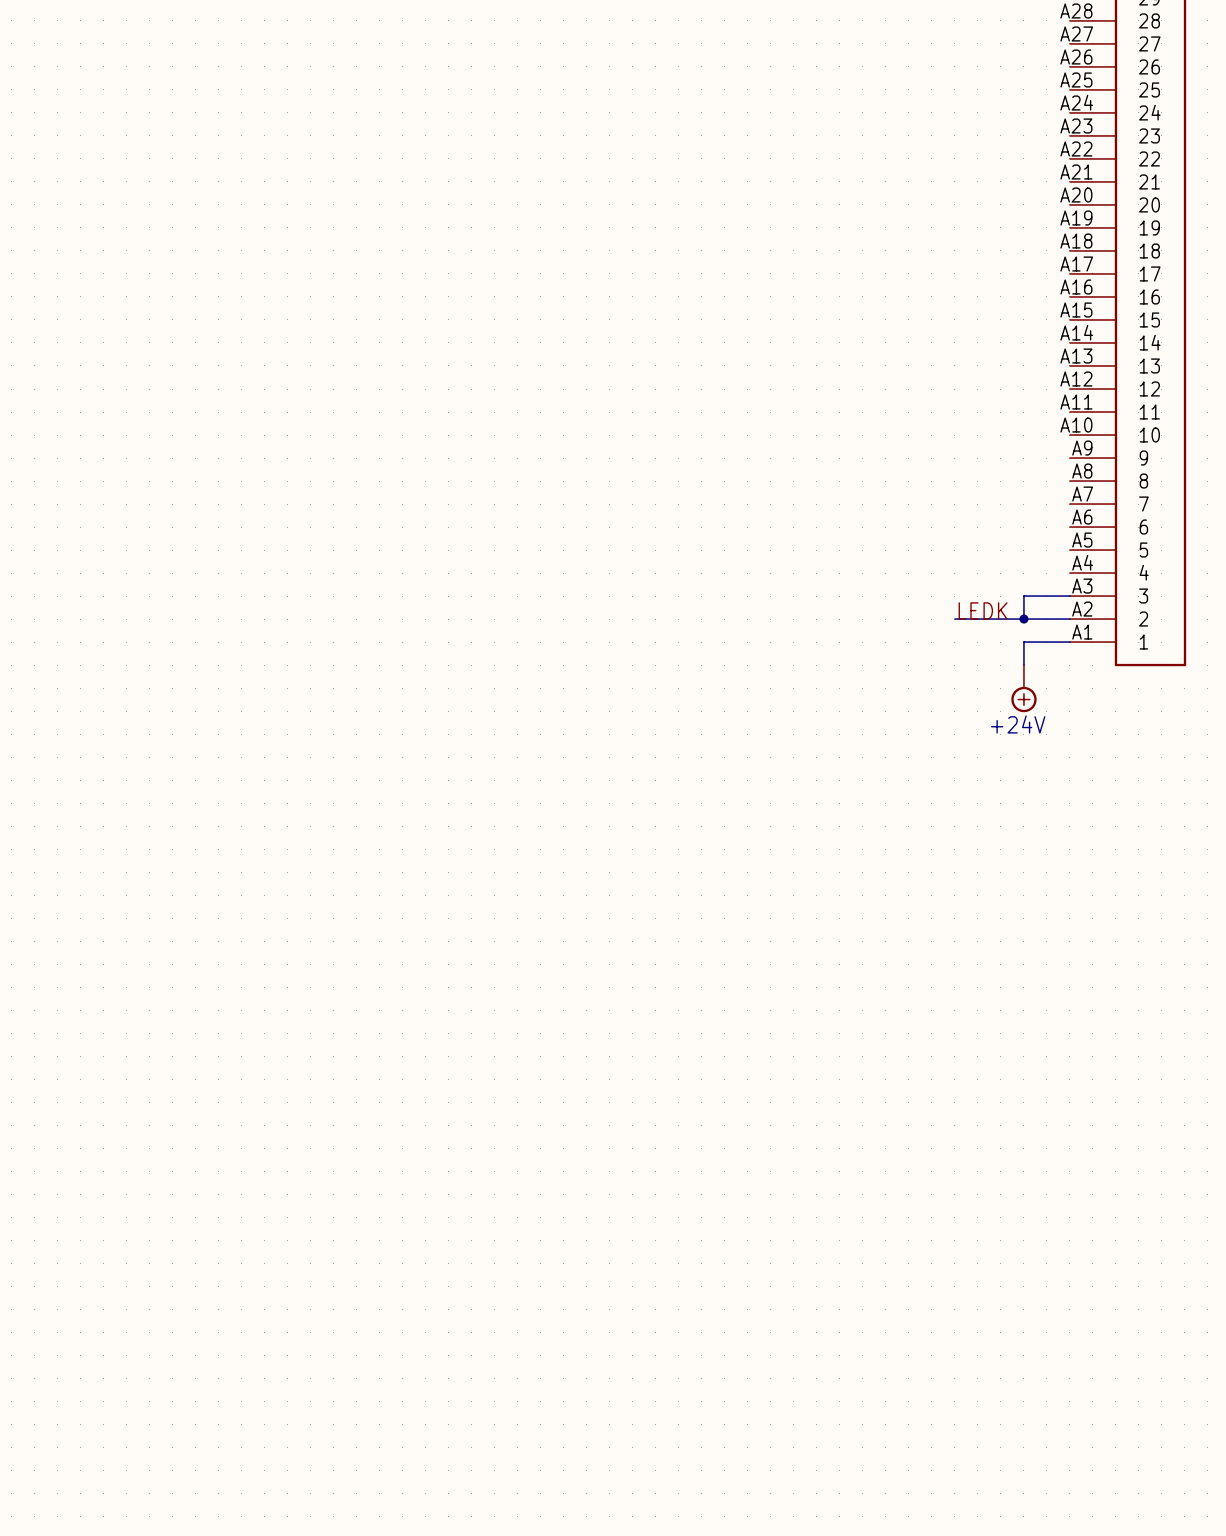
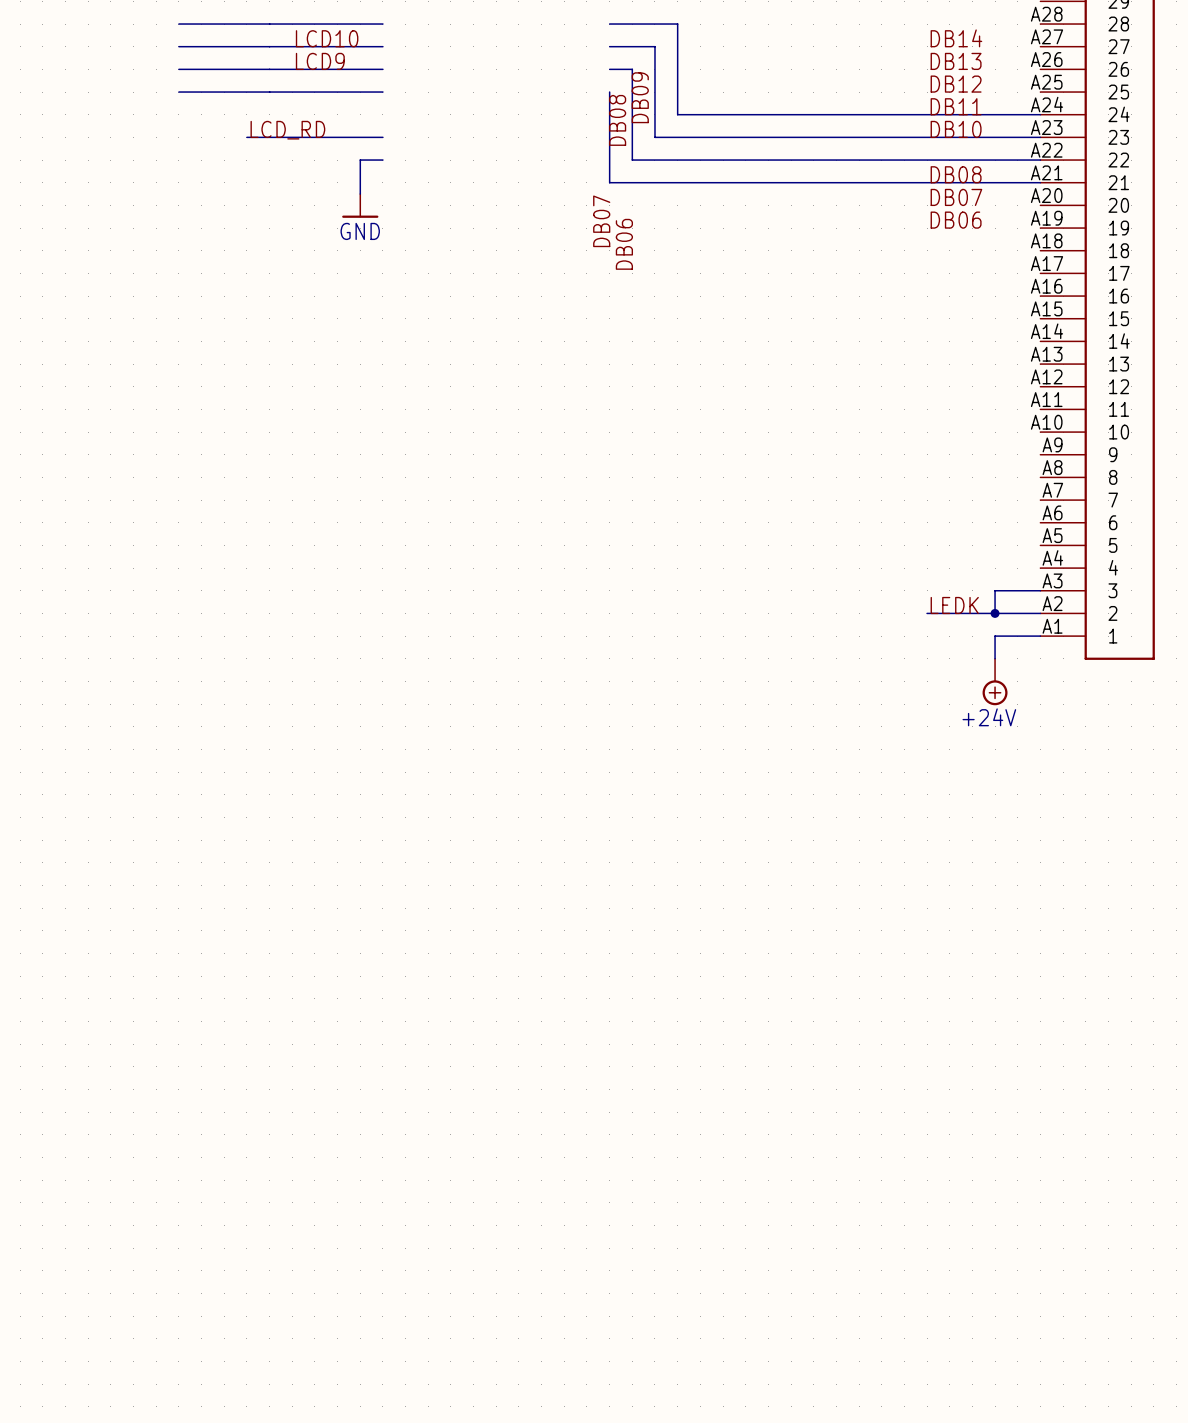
wire: none -> (178, 24) (382, 24)
wire: none -> (609, 24) (677, 24) (677, 114) (1040, 114)
label: none -> LCD10 (327, 38)
label: none -> DB14 (956, 38)
wire: none -> (178, 46) (382, 46)
wire: none -> (609, 46) (654, 46) (654, 137) (1040, 137)
label: none -> LCD9 (320, 61)
label: none -> DB13 (956, 61)
wire: none -> (178, 69) (382, 69)
wire: none -> (609, 69) (632, 69) (632, 160) (1040, 160)
label: none -> DB12 (956, 84)
wire: none -> (178, 92) (382, 92)
wire: none -> (609, 92) (609, 182) (1040, 182)
label: none -> DB09 (640, 97)
label: none -> DB11 (956, 106)
label: none -> DB08 (617, 120)
label: none -> DB10 (956, 129)
label: none -> LCD_RD (287, 130)
wire: none -> (246, 137) (382, 137)
wire: none -> (382, 160) (360, 160) (360, 194)
label: none -> DB08 (956, 174)
label: none -> DB07 (956, 197)
power symbol: none -> GND (360, 205)
label: none -> DB06 (956, 220)
label: none -> DB07 (601, 221)
label: none -> DB06 (624, 244)

